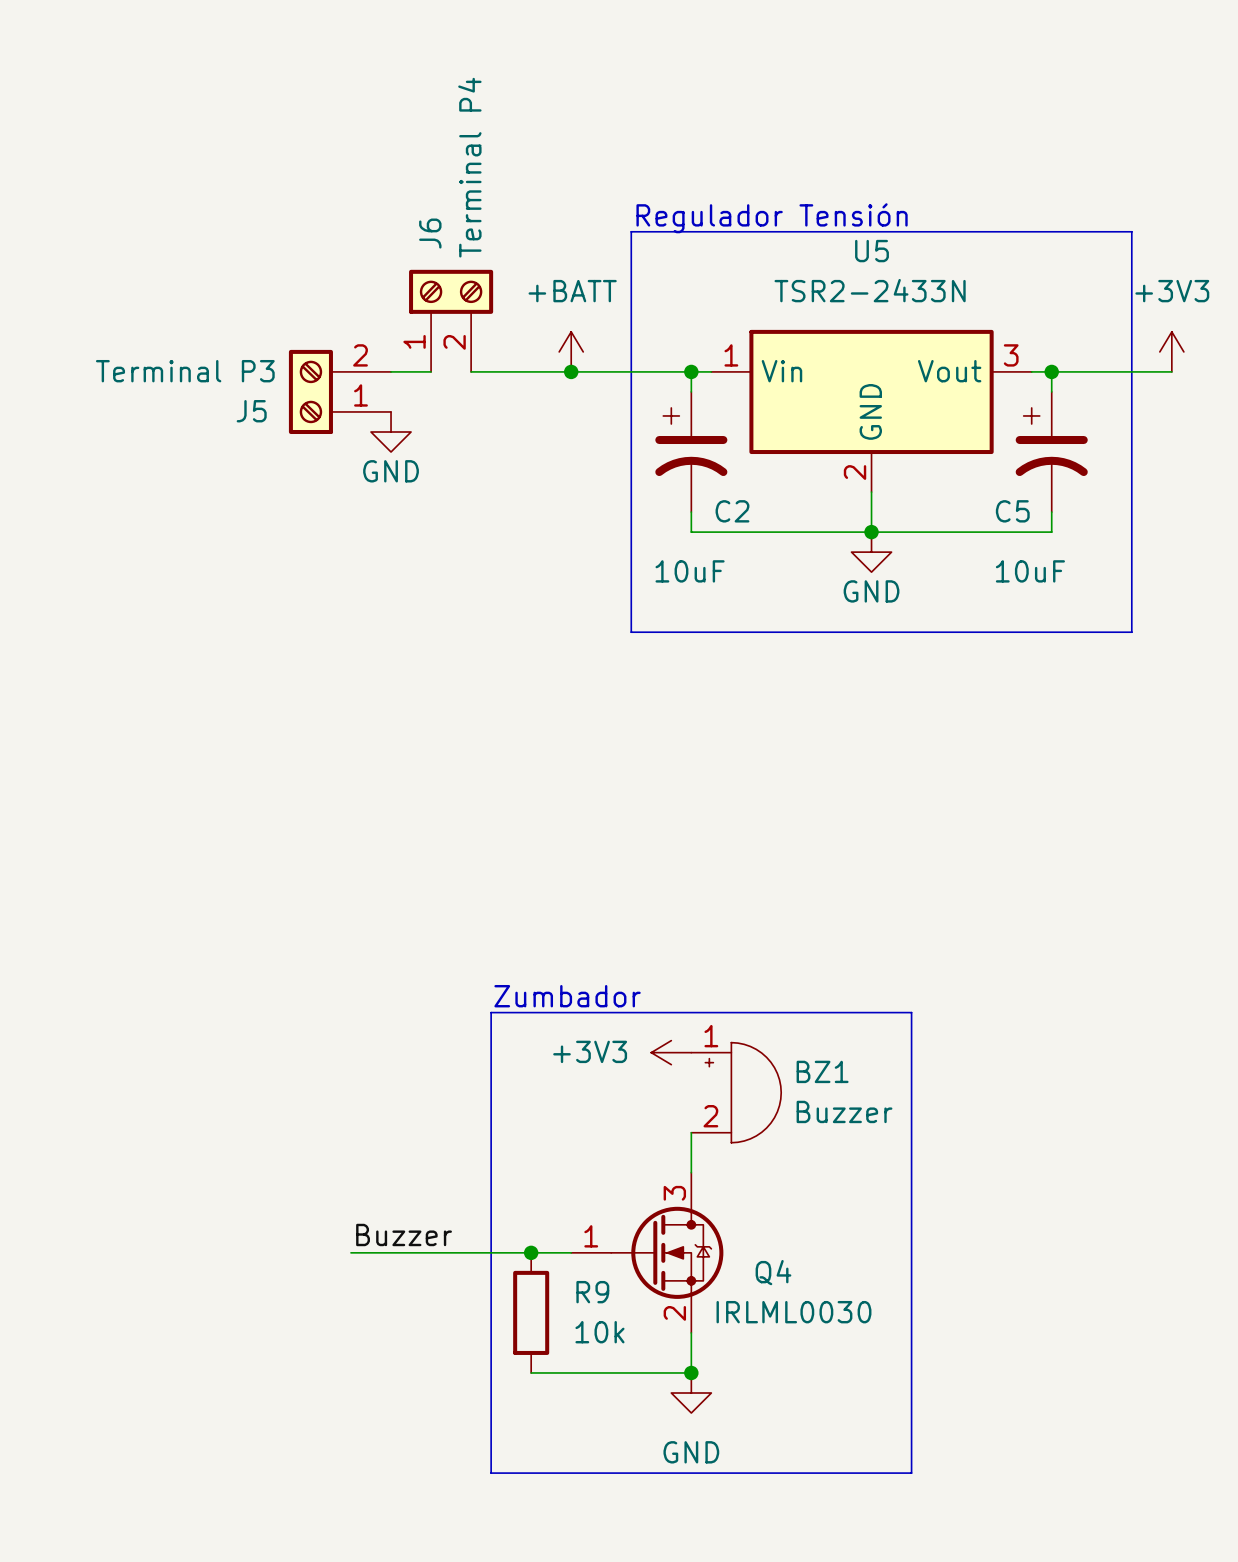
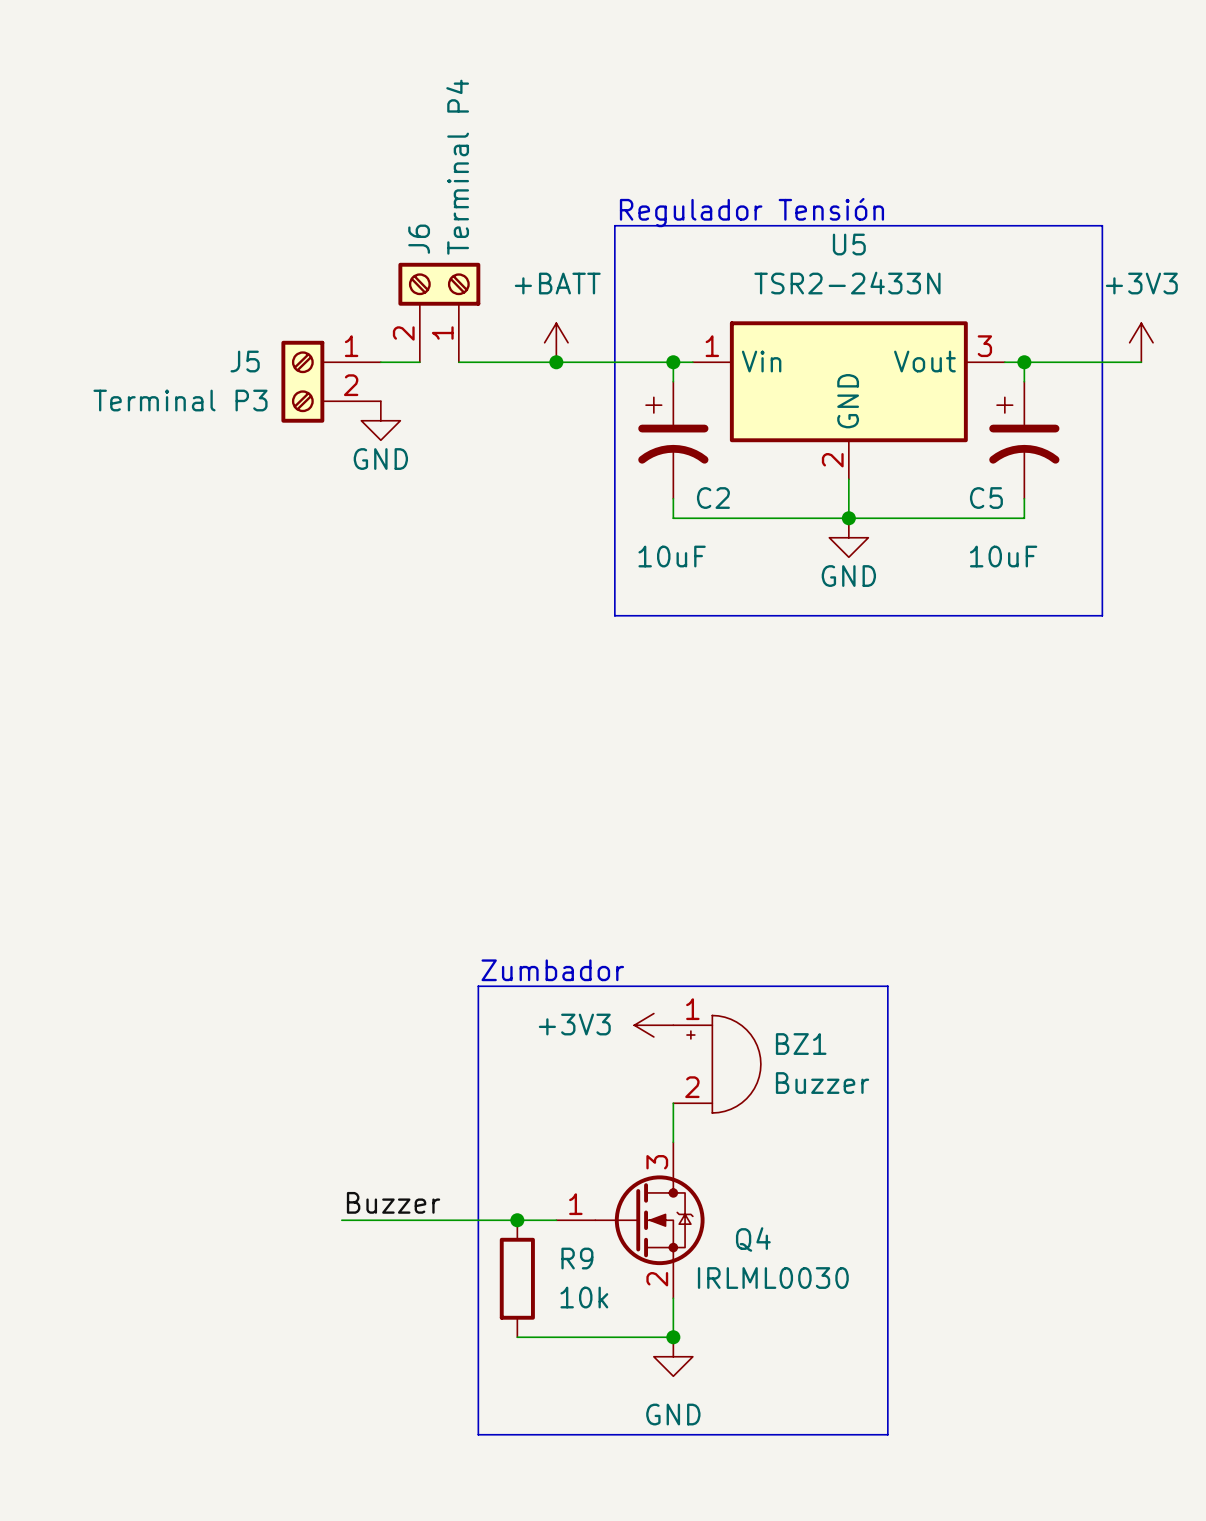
J6 flip: as is (451, 291) -> left-right (439, 284)
J5 flip: as is (310, 391) -> up-down (302, 381)

